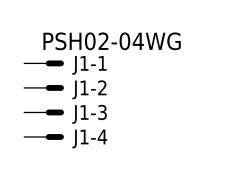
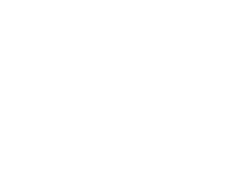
J1-1: PSH02-04WG (44, 63) -> none
J1-2: (44, 87) -> none
J1-3: (44, 112) -> none
J1-4: (44, 137) -> none

